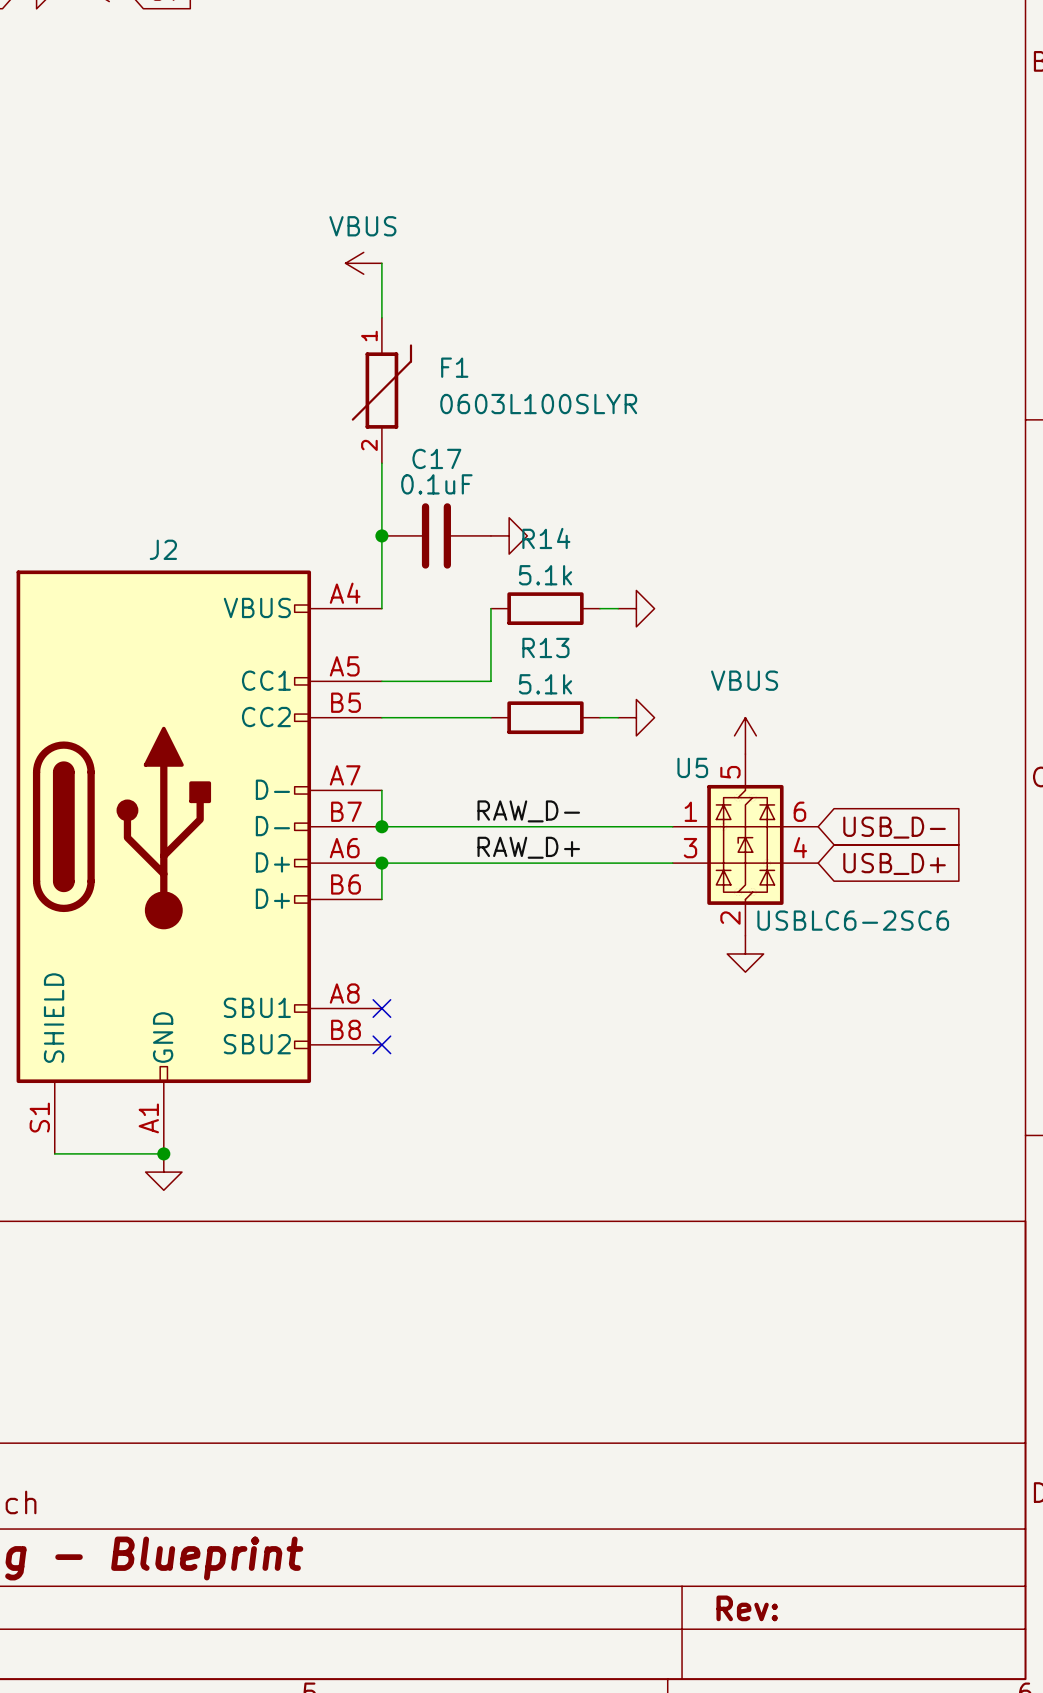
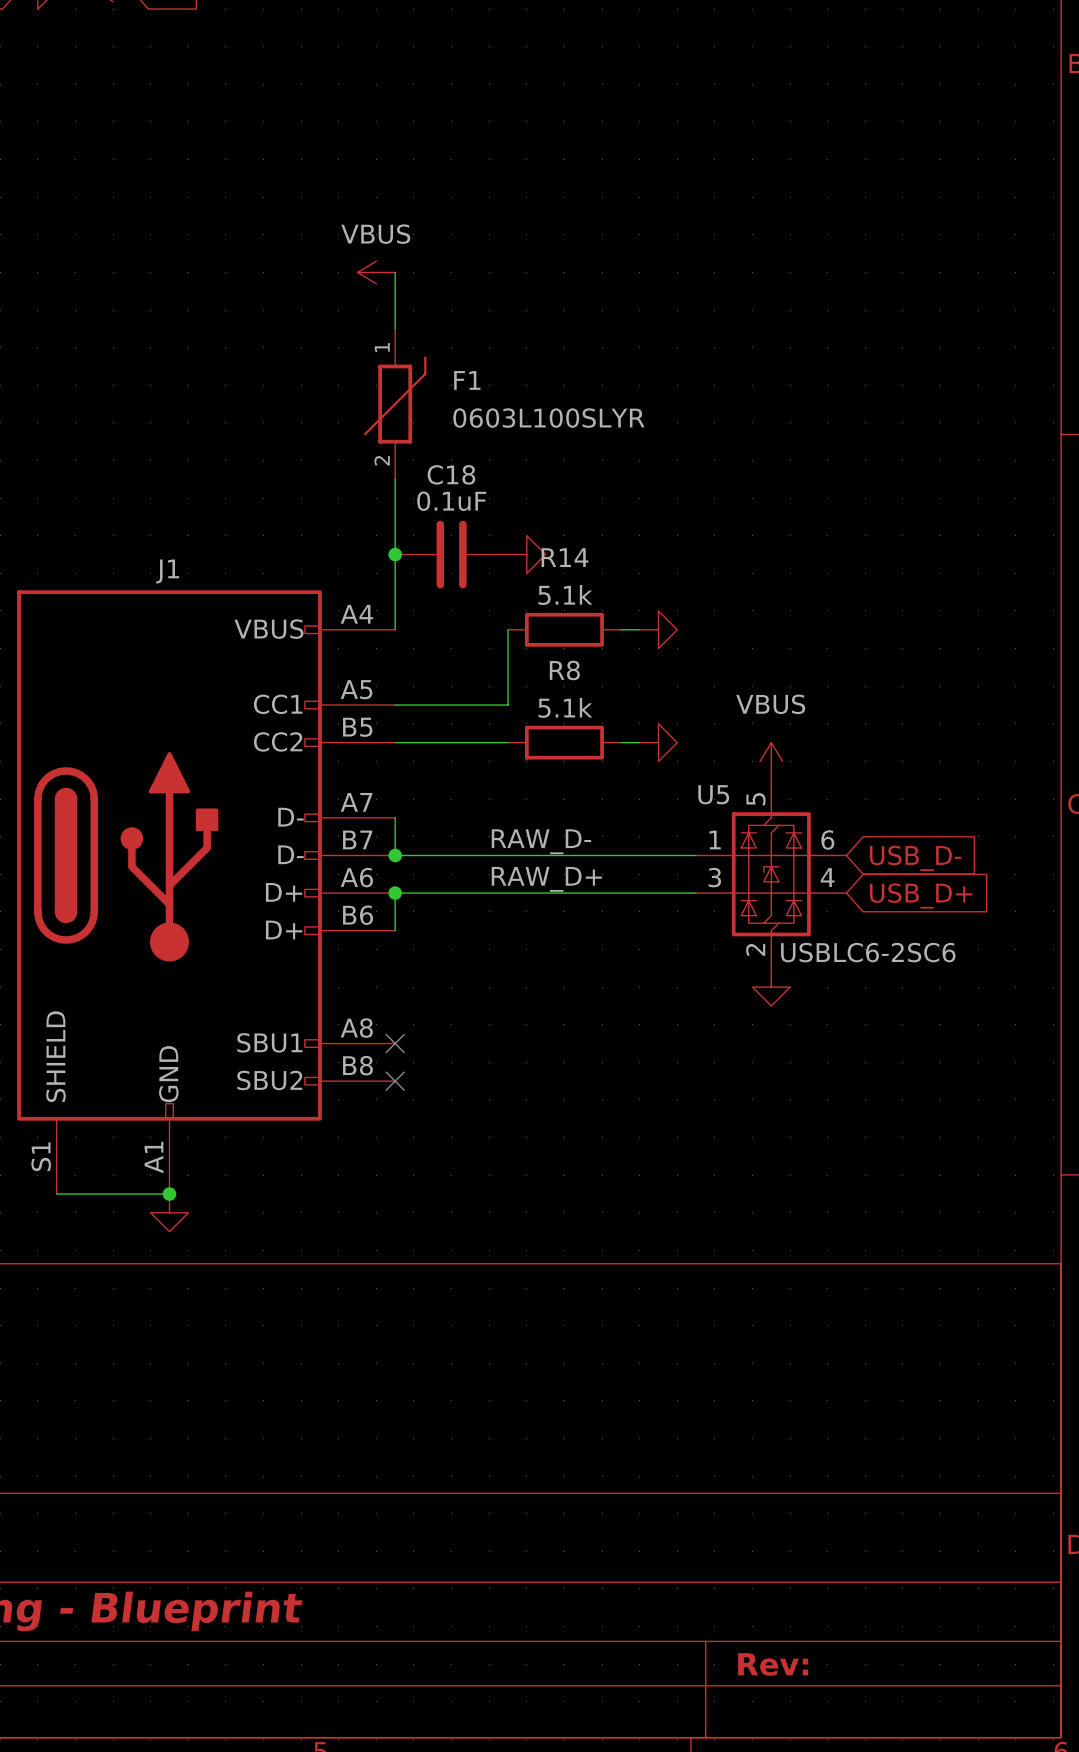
C17 name: C17 (436, 458) -> C18 (451, 474)
J2 name: J2 (163, 549) -> J1 (167, 571)
R13 name: R13 (545, 647) -> R8 (564, 670)

